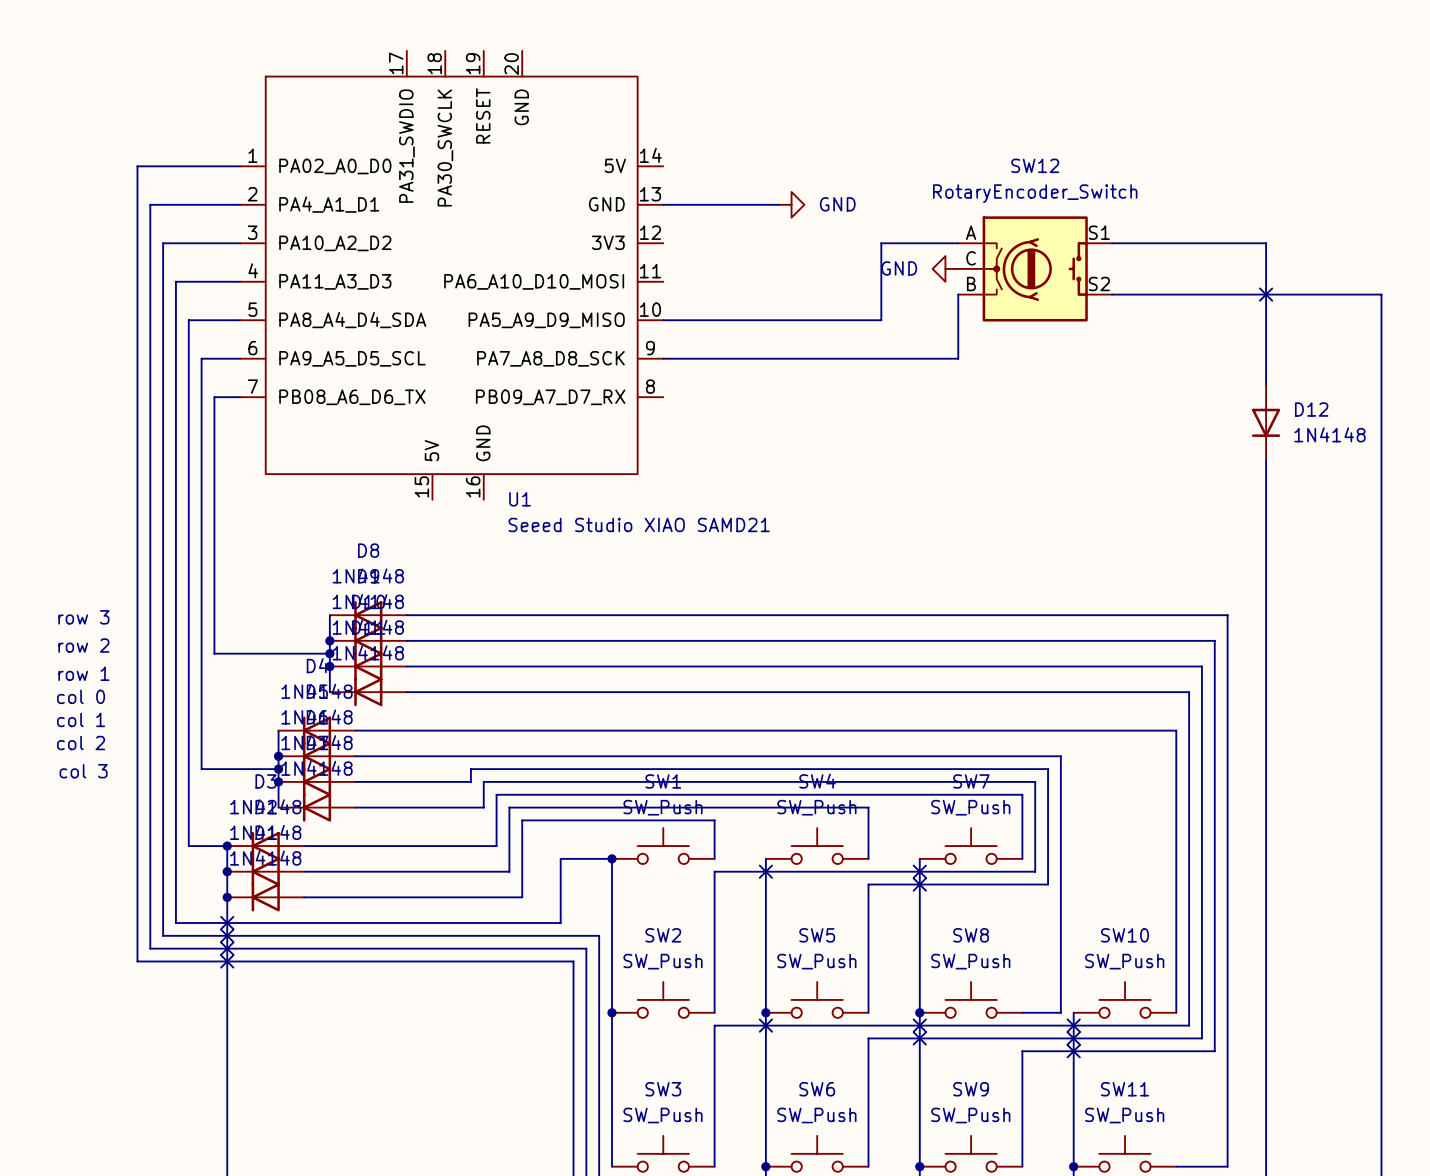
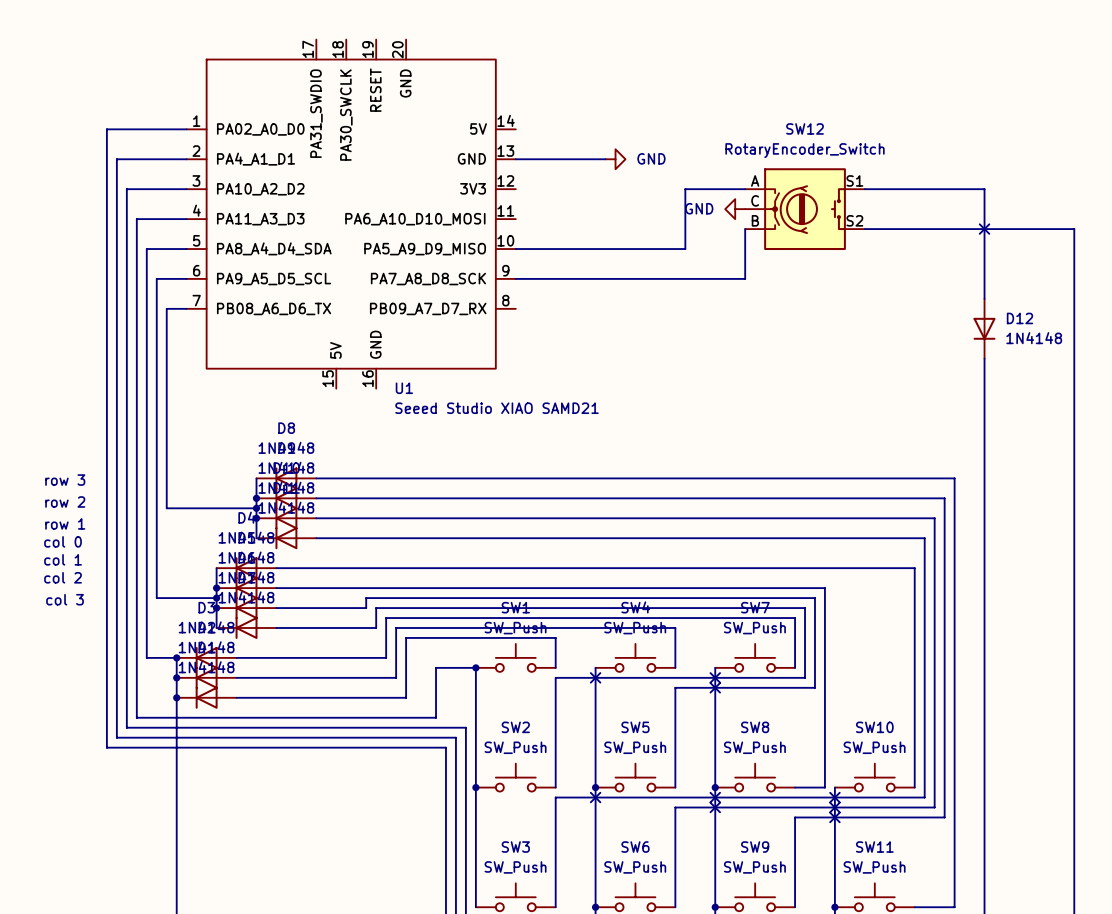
no-connect mark: (227, 923) -> none
no-connect mark: (227, 935) -> none
no-connect mark: (227, 948) -> none
no-connect mark: (227, 961) -> none

